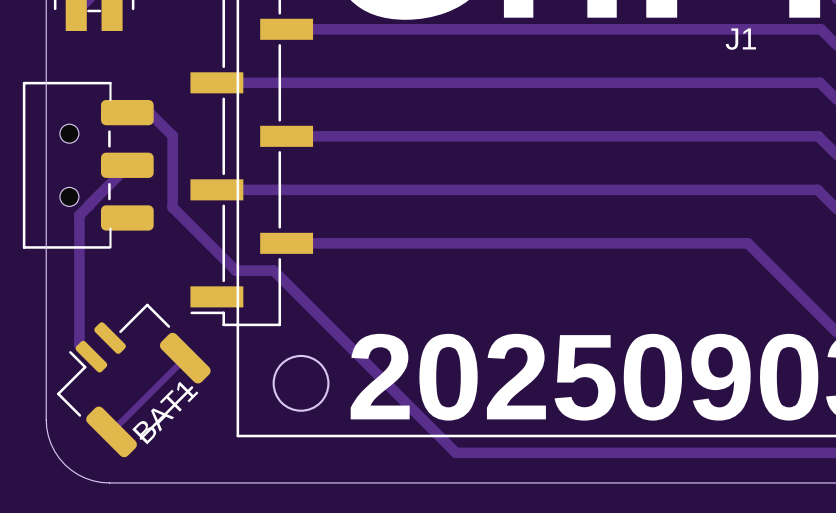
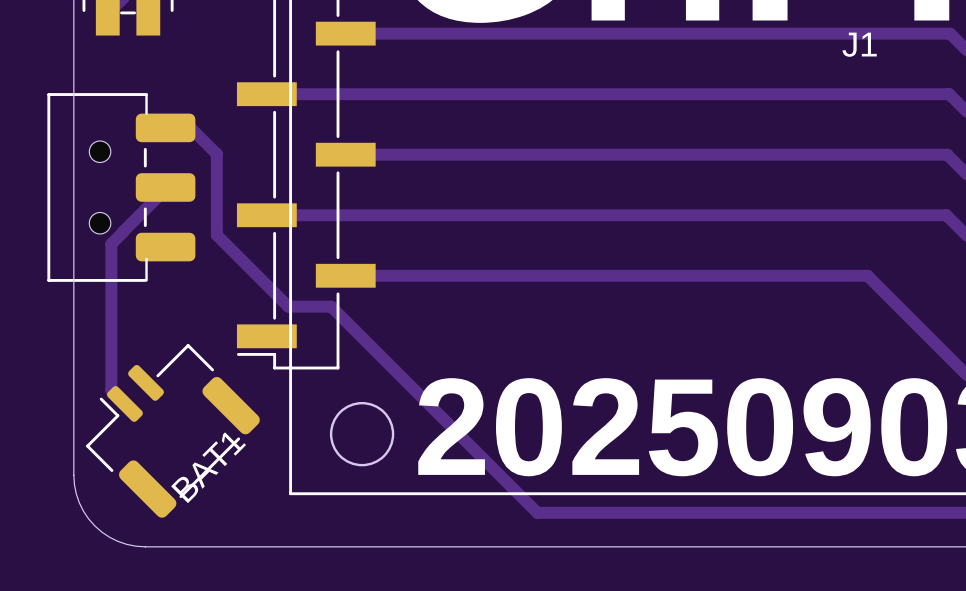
track: (185, 358) (111, 431) -> none

